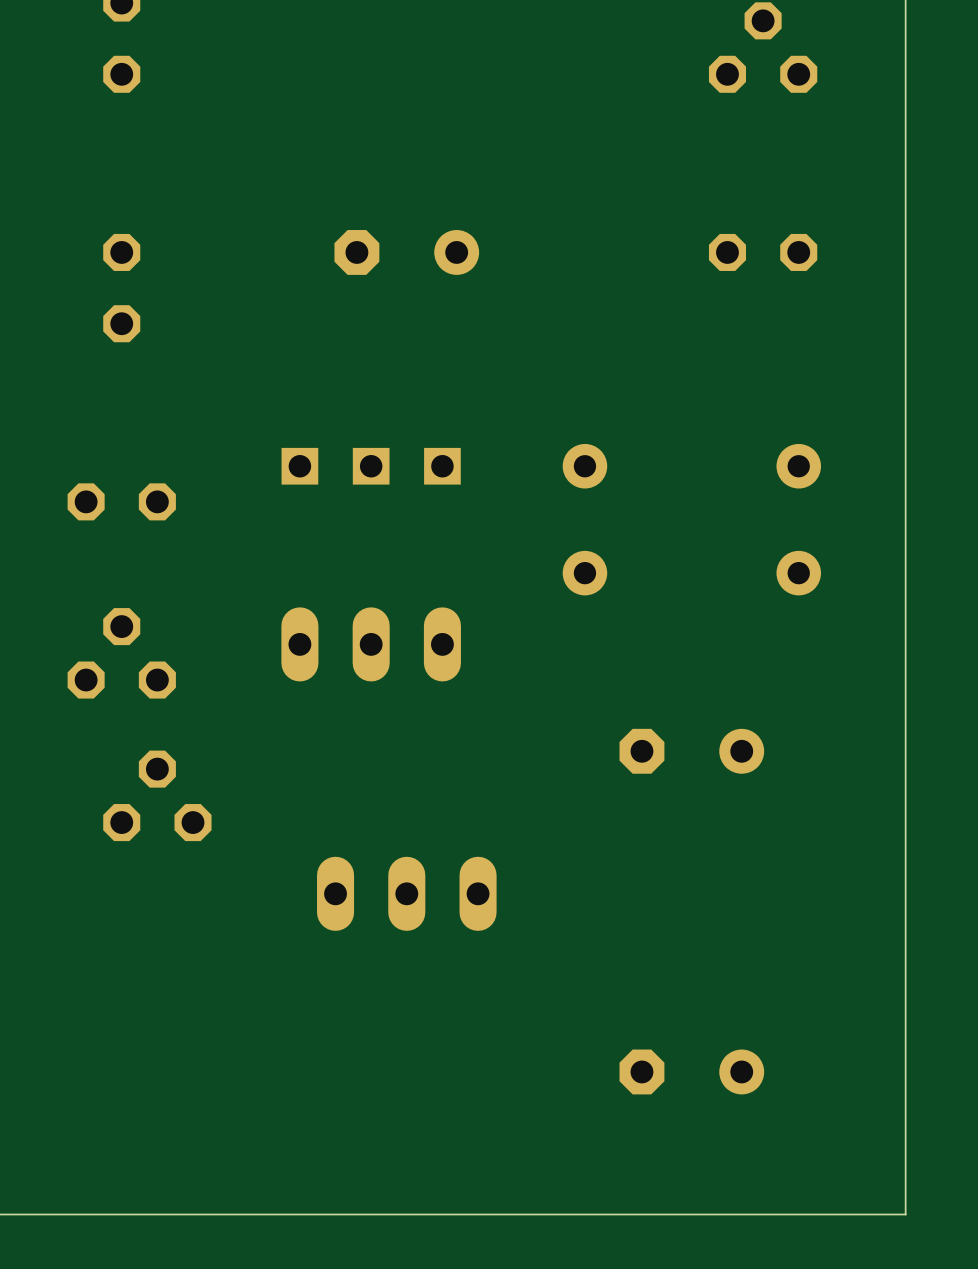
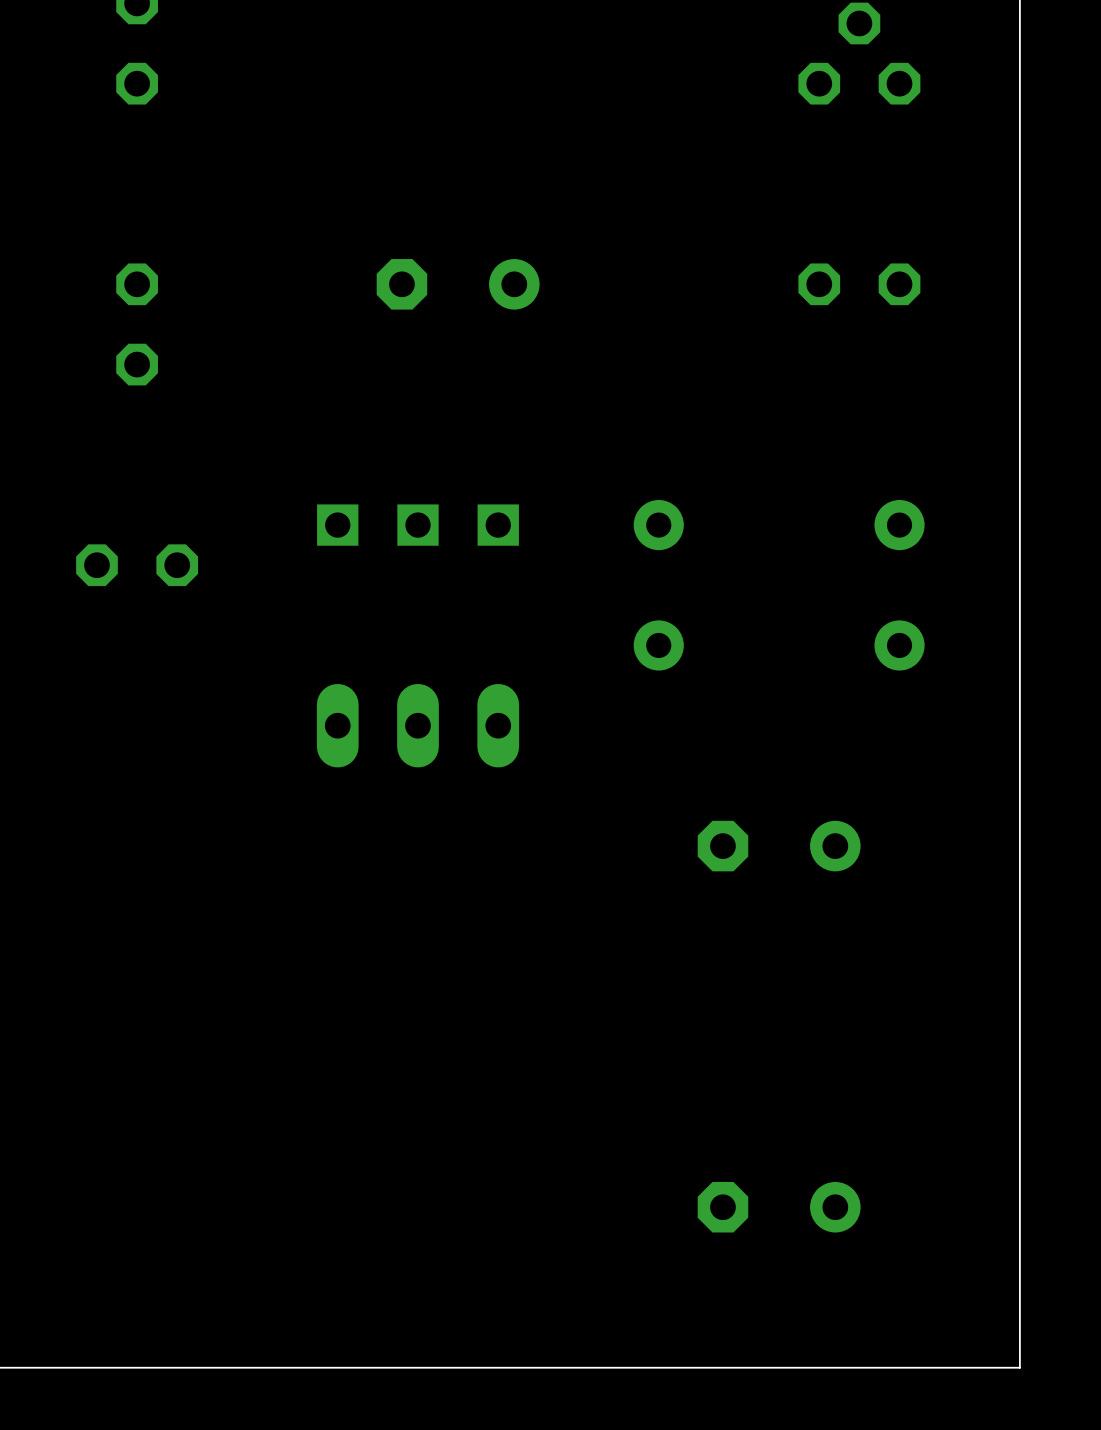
part: (121, 653) -> none
part: (157, 795) -> none
part: (406, 893) -> none

